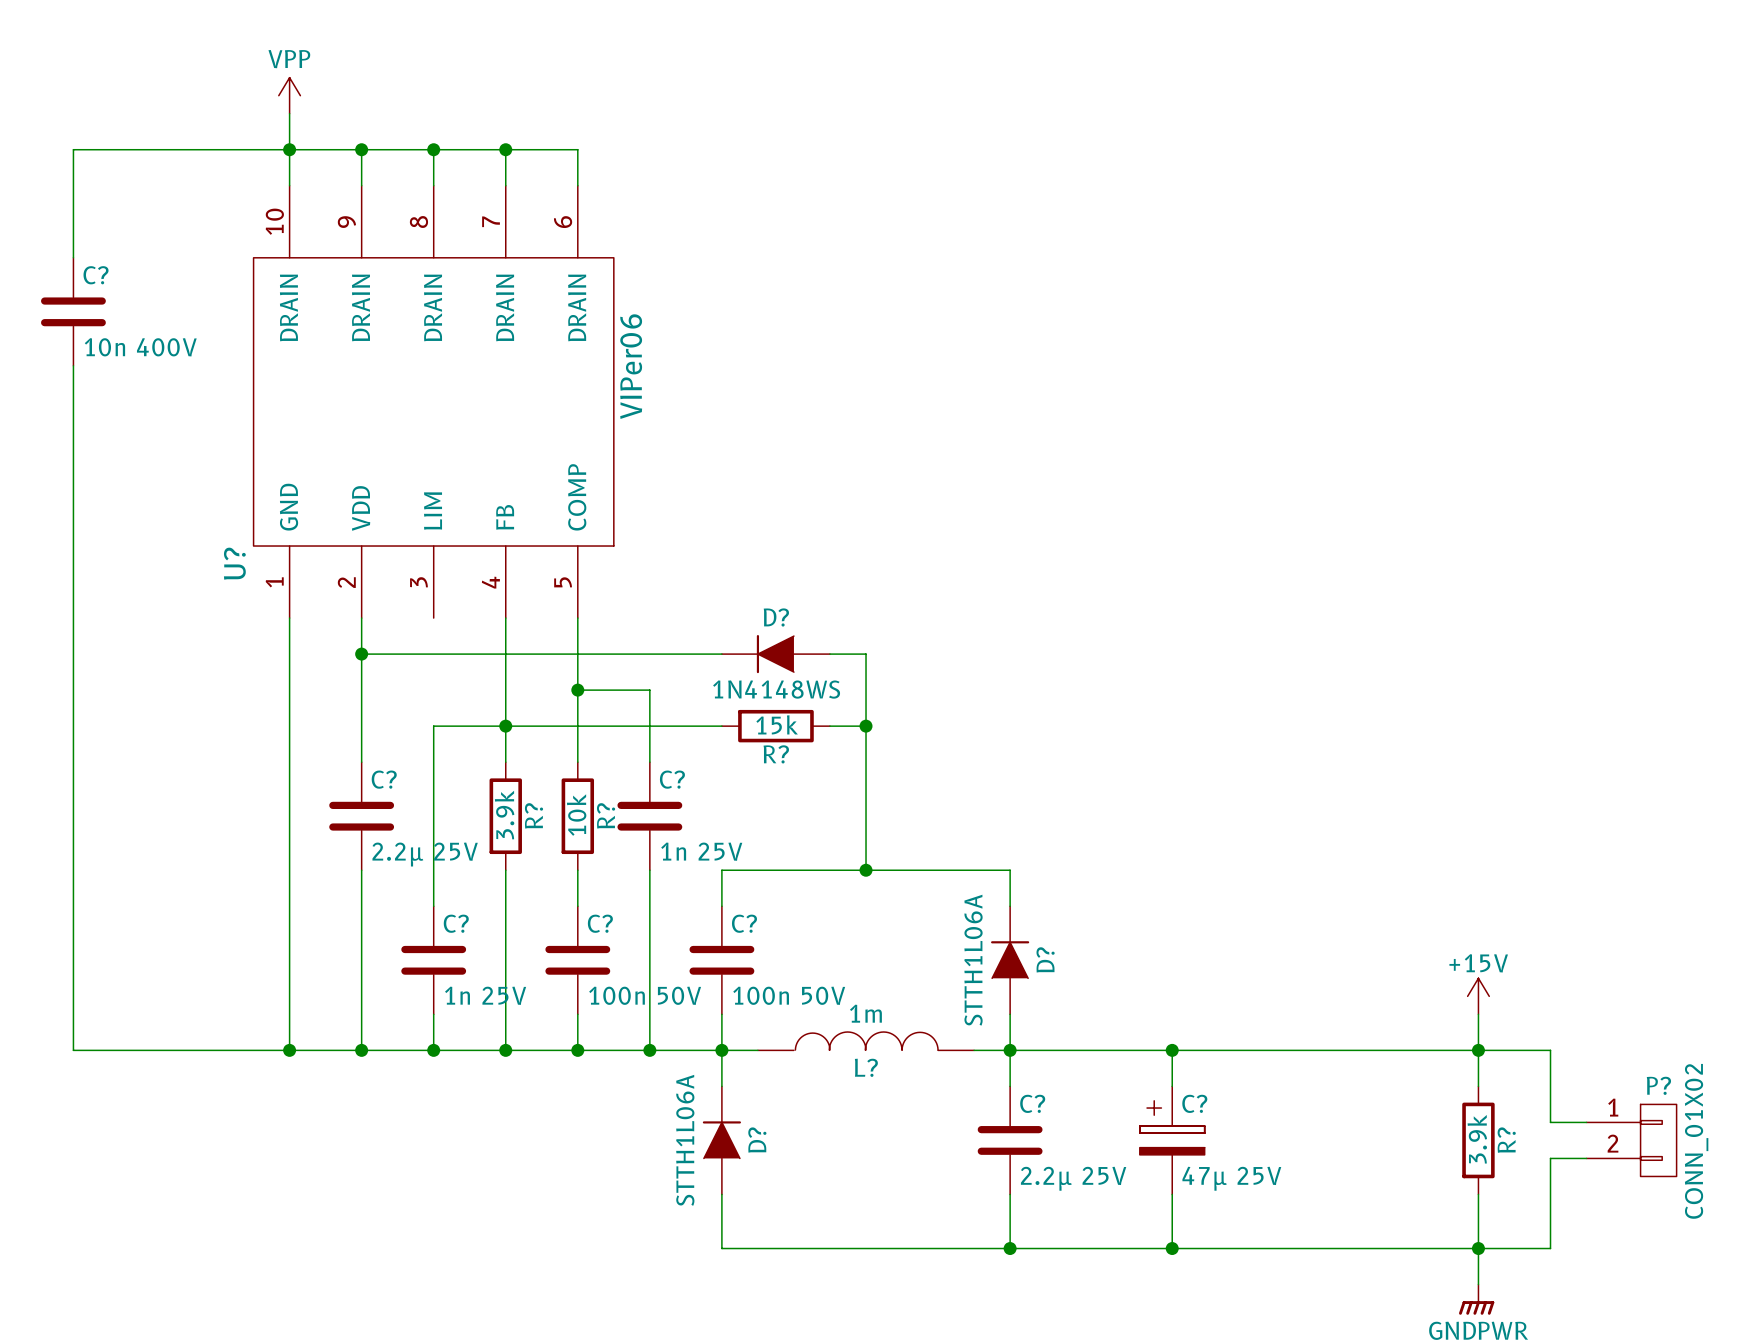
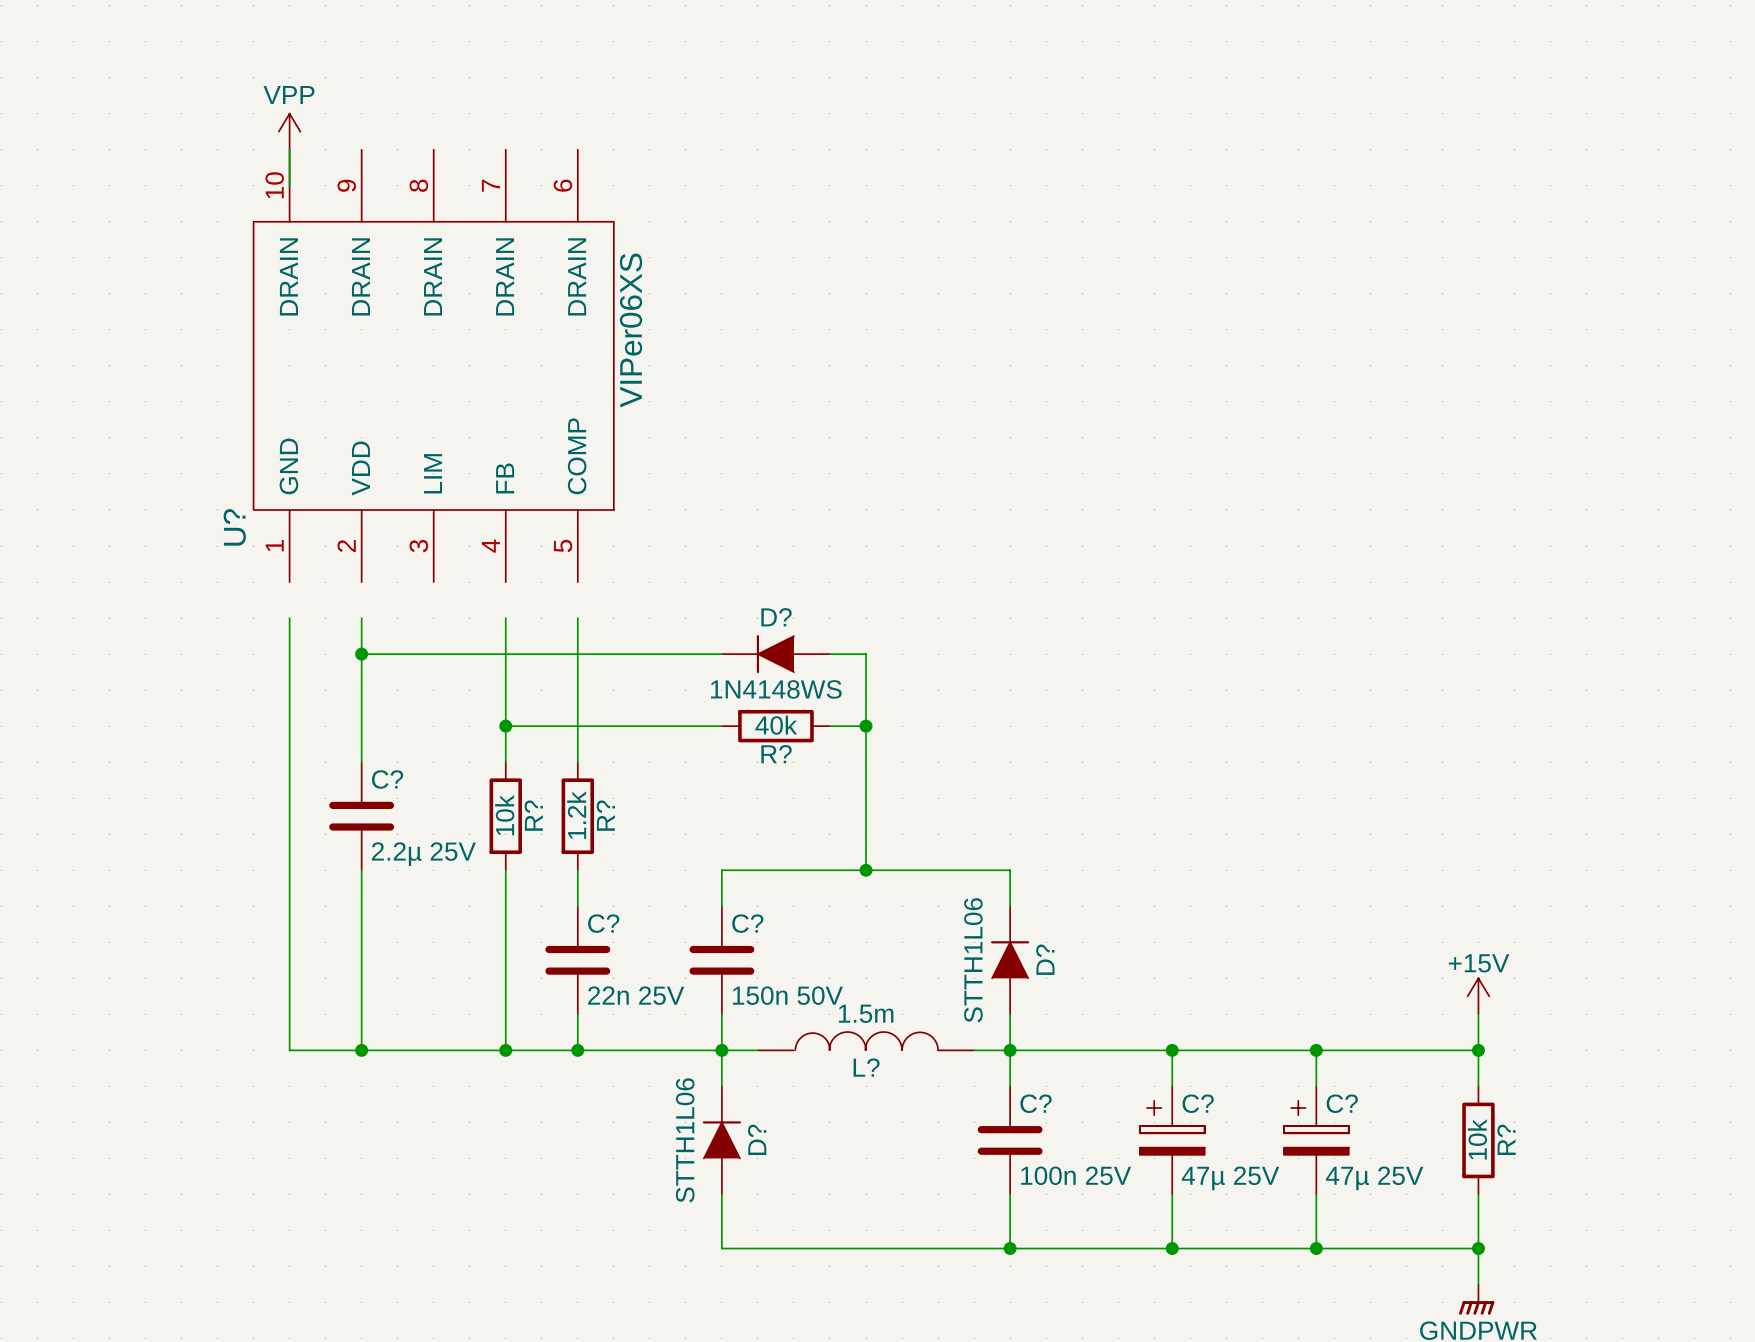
power symbol position: VPP (289, 95) -> VPP (289, 131)
junction: (289, 149) -> none
junction: (361, 149) -> none
junction: (433, 149) -> none
junction: (505, 149) -> none
wire: (577, 185) (577, 149) (73, 149) (73, 257) -> none
C?: 10n 400V (73, 311) -> none
wire: (73, 365) (73, 1050) (289, 1050) -> none
U?: none -> VIPer06XS (433, 365)
U?: VIPer06 (433, 401) -> none
wire: (577, 690) (649, 690) (649, 762) -> none
junction: (577, 690) -> none
R? value: 15k (777, 724) -> 40k (776, 725)
wire: (505, 726) (433, 726) (433, 906) -> none
R? value: 3.9k (504, 815) -> 10k (504, 815)
R? value: 10k (576, 815) -> 1.2k (576, 815)
C?: 1n 25V (649, 816) -> none
wire: (649, 870) (649, 1050) -> none
C?: 1n 25V (433, 960) -> none
D? value: STTH1L06A (973, 960) -> STTH1L06 (973, 960)
C? value: 100n 50V (645, 995) -> 22n 25V (636, 995)
C? value: 100n 50V (789, 995) -> 150n 50V (787, 995)
L? value: 1m (865, 1013) -> 1.5m (866, 1013)
wire: (433, 1014) (433, 1050) -> none
junction: (289, 1050) -> none
junction: (433, 1050) -> none
junction: (649, 1050) -> none
wire: none -> (1316, 1050) (1316, 1086)
junction: none -> (1316, 1050)
wire: (1478, 1050) (1550, 1050) (1550, 1122) (1586, 1122) -> none
R? value: 3.9k (1477, 1139) -> 10k (1477, 1139)
D? value: STTH1L06A (685, 1140) -> STTH1L06 (685, 1140)
C?: none -> 47µ 25V (1316, 1140)
P?: CONN_01X02 (1631, 1140) -> none
wire: (1586, 1158) (1550, 1158) (1550, 1248) (1478, 1248) -> none
C? value: 2.2µ 25V (1073, 1178) -> 100n 25V (1076, 1175)
wire: none -> (1316, 1194) (1316, 1248)
junction: none -> (1316, 1248)

